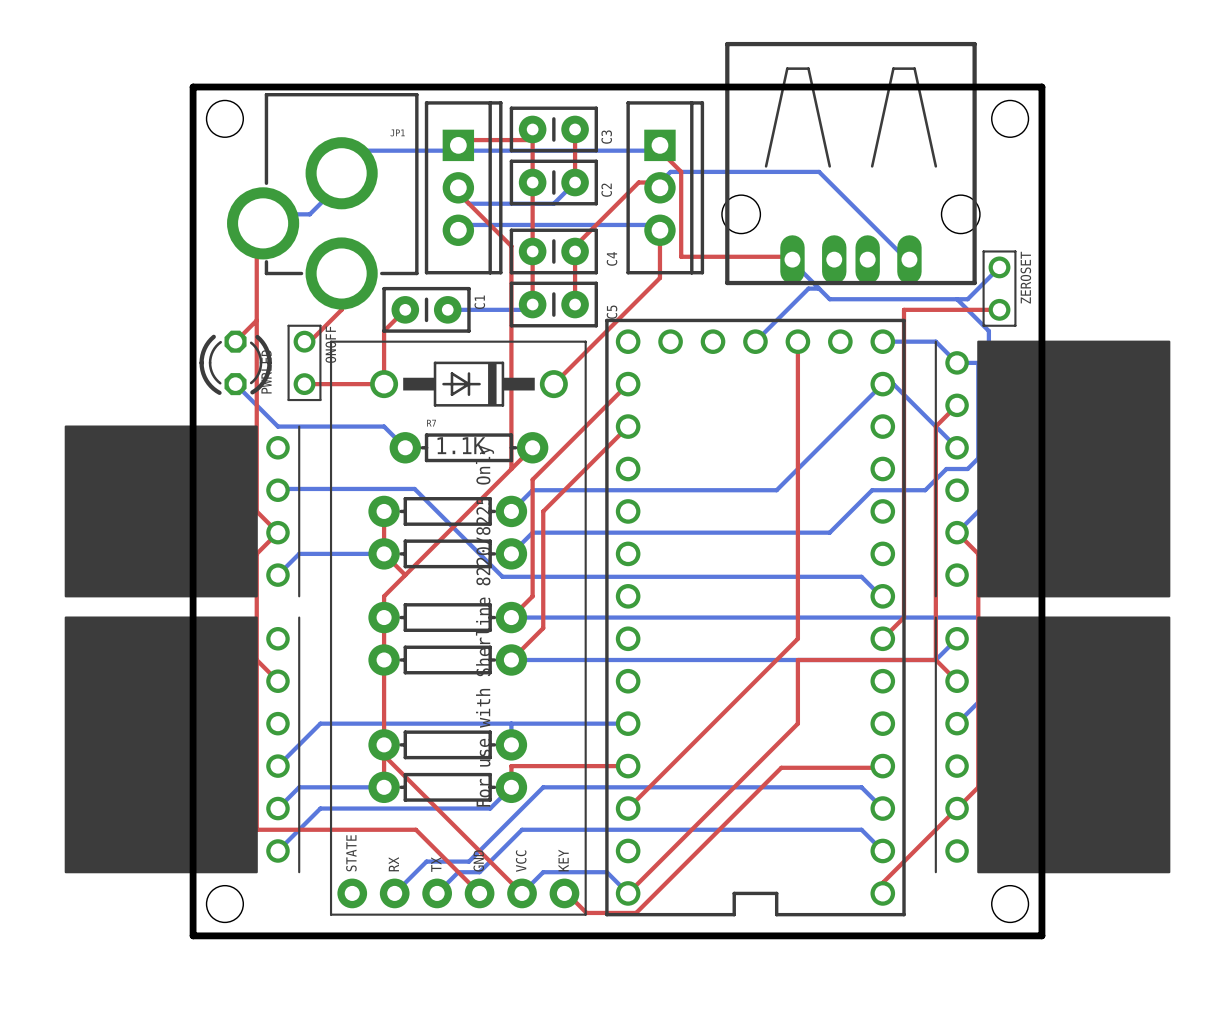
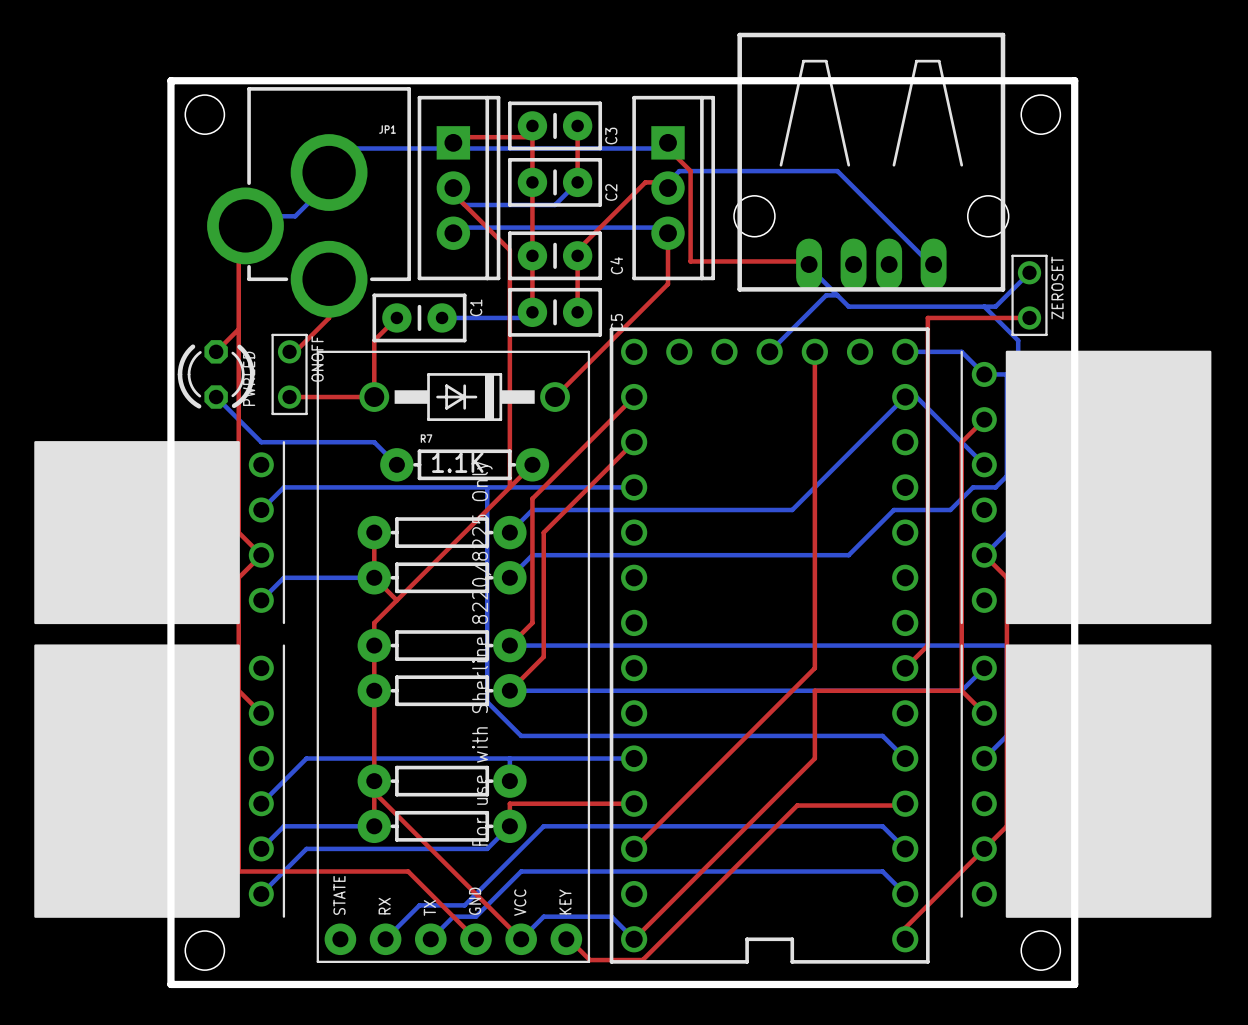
bottom track: none -> (487, 487) (487, 702) (521, 735) (882, 735) (905, 758)
bottom track: (277, 490) (414, 488) (502, 576) (861, 576) (882, 596) -> (261, 510) (283, 487) (634, 487)

